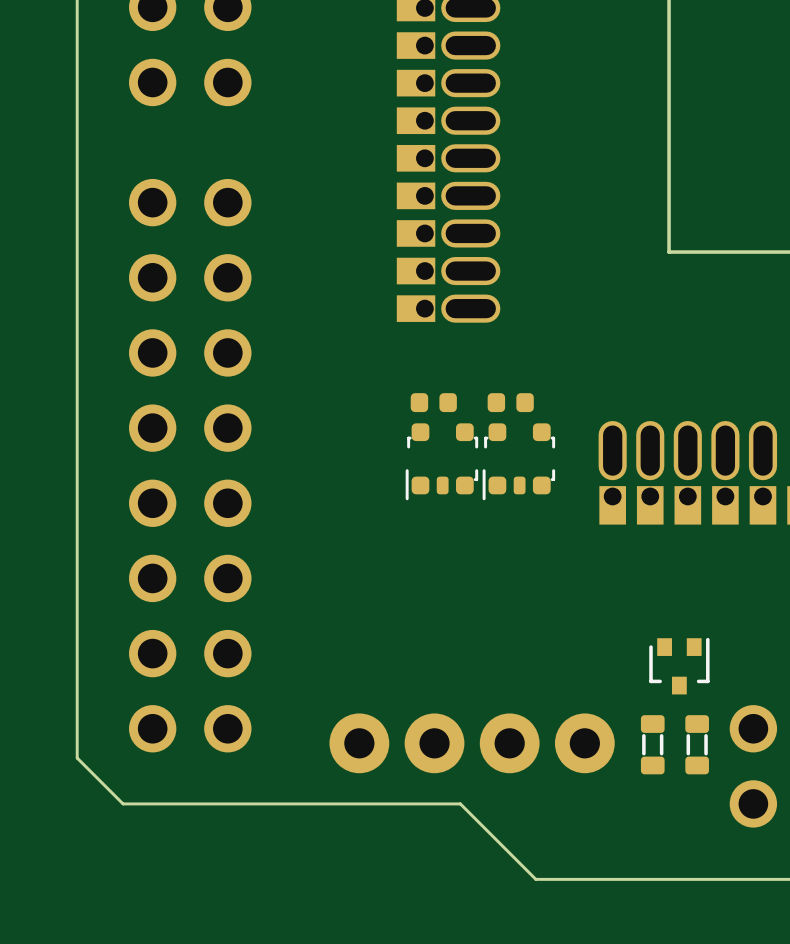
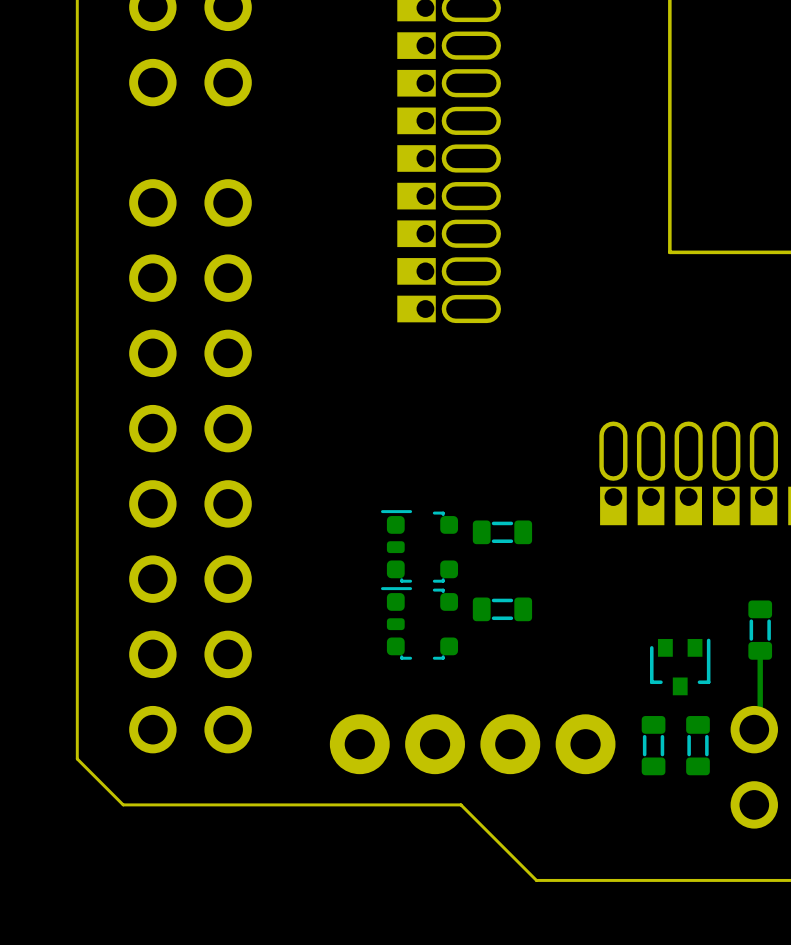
part: (433, 402) -> none
part: (510, 402) -> none
part: (441, 461) -> none
part: (518, 461) -> none
part: none -> (502, 532)
part: none -> (419, 546)
part: none -> (502, 609)
part: none -> (419, 623)
part: none -> (760, 630)
track: none -> (760, 650) (760, 723) (754, 729)

